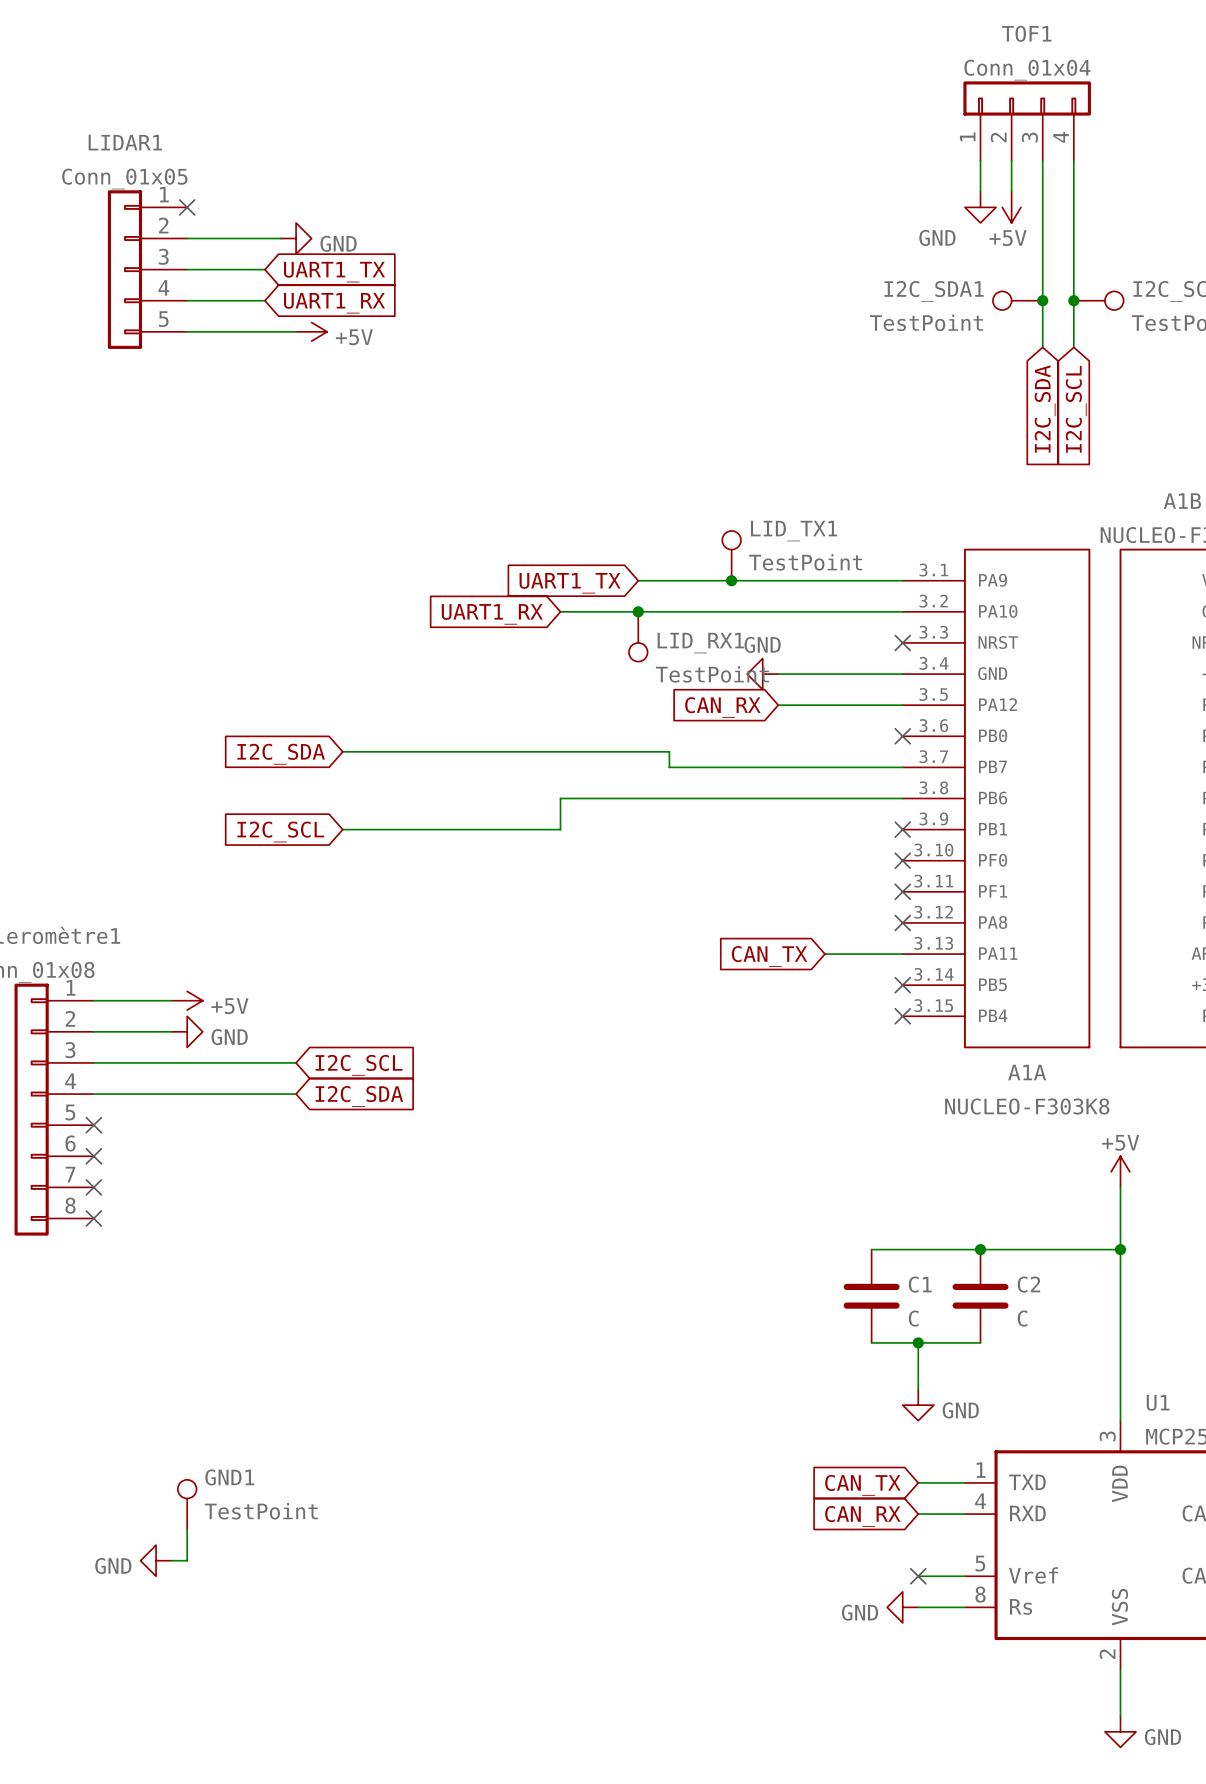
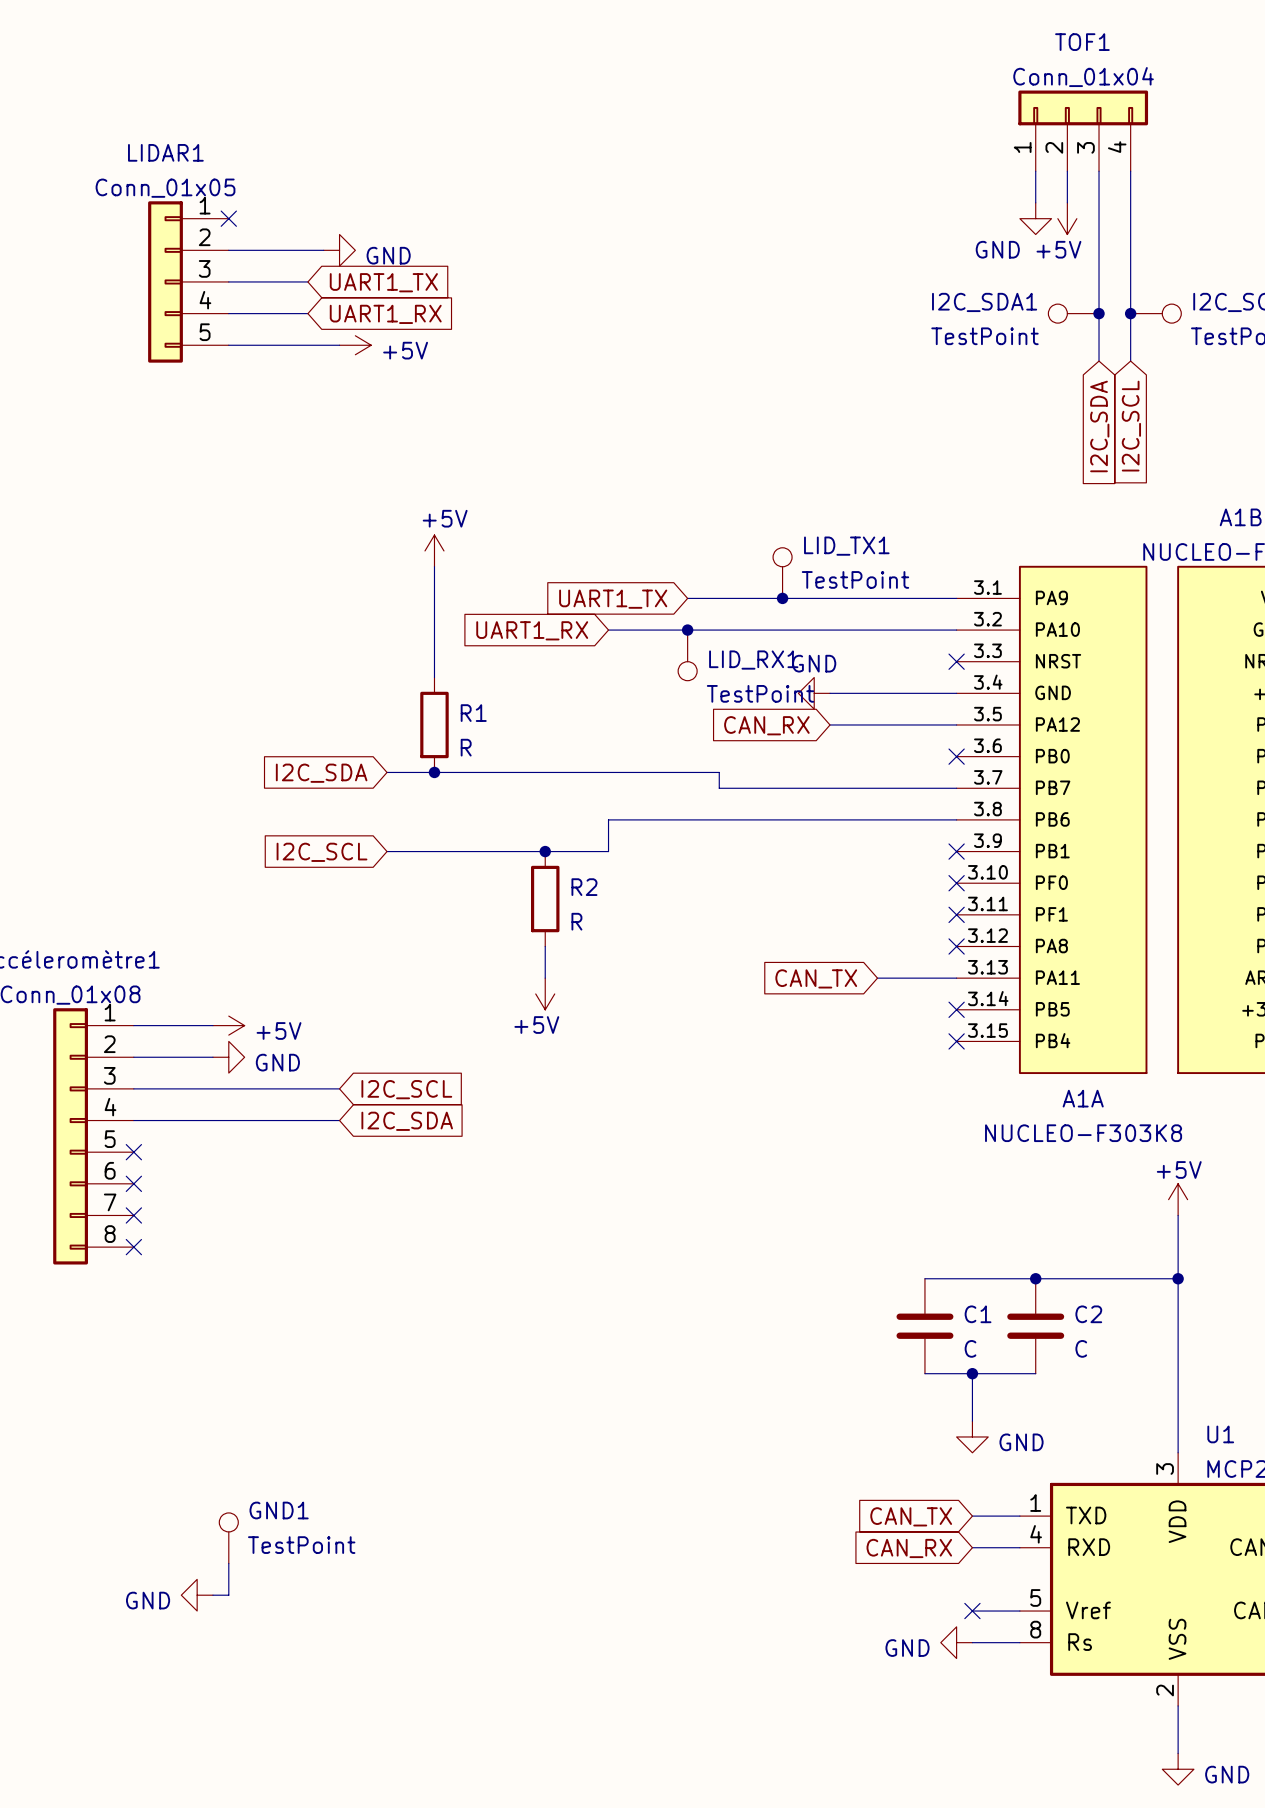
power symbol: none -> +5V (434, 550)
wire: none -> (434, 566) (434, 677)
R1: none -> R (434, 724)
junction: none -> (434, 772)
junction: none -> (545, 851)
R2: none -> R (545, 899)
wire: none -> (545, 946) (545, 978)
power symbol: none -> +5V (545, 993)

